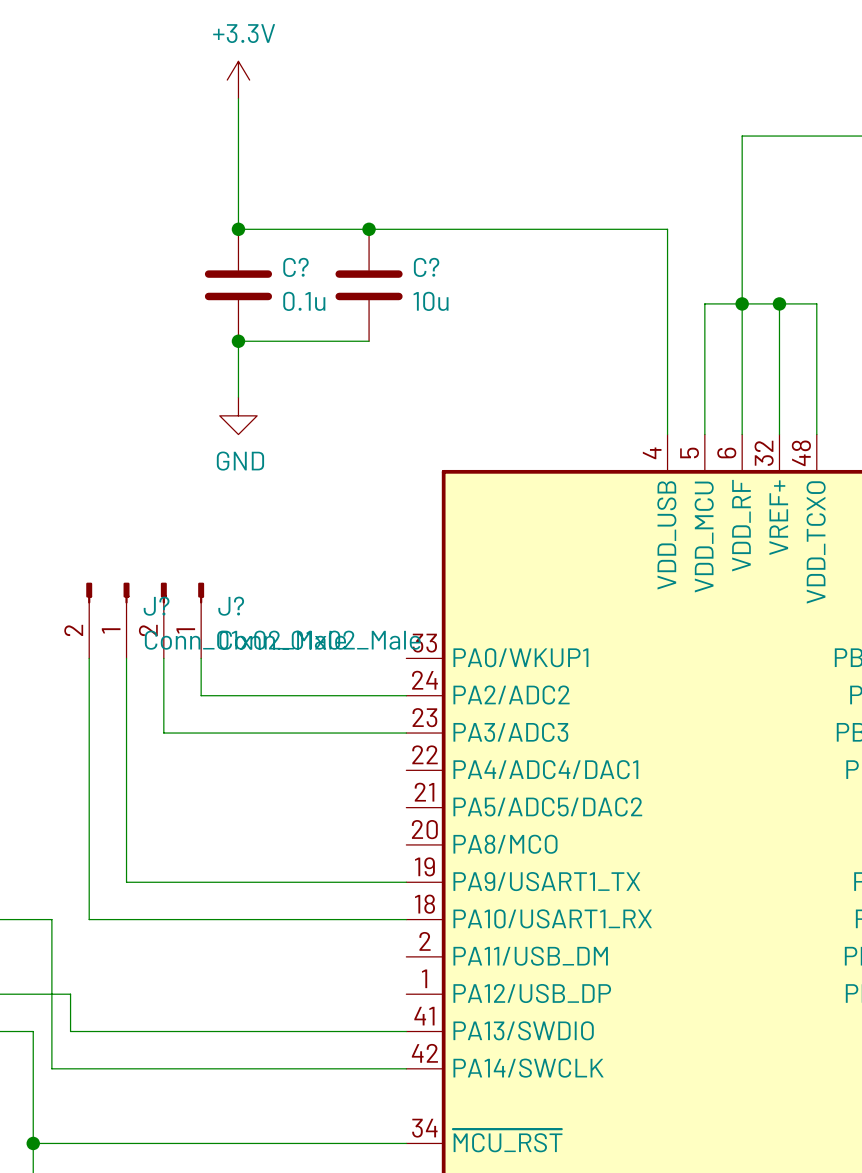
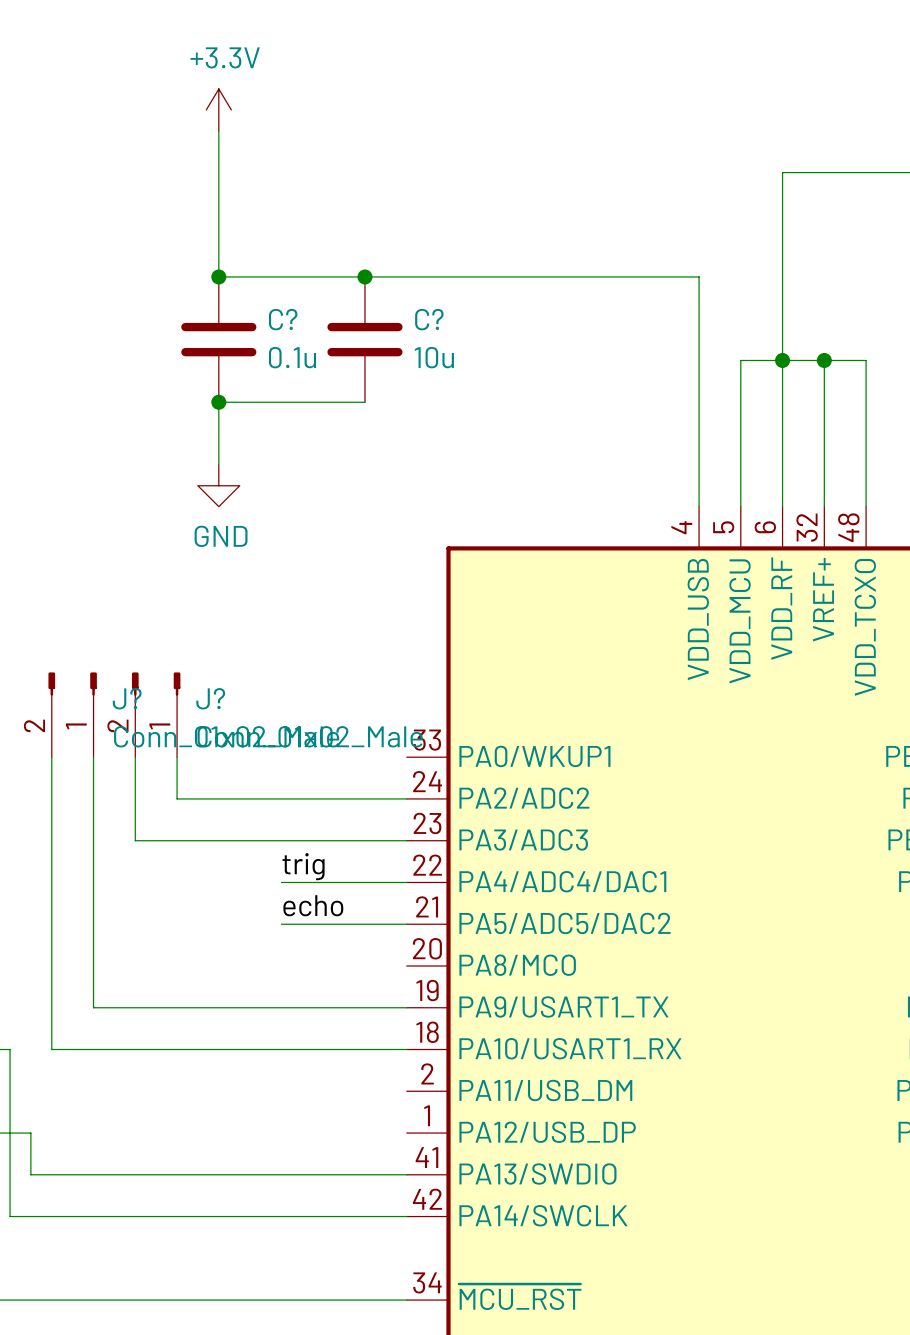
label: none -> trig (303, 866)
wire: none -> (281, 882) (406, 882)
label: none -> echo (313, 905)
wire: none -> (281, 924) (406, 924)

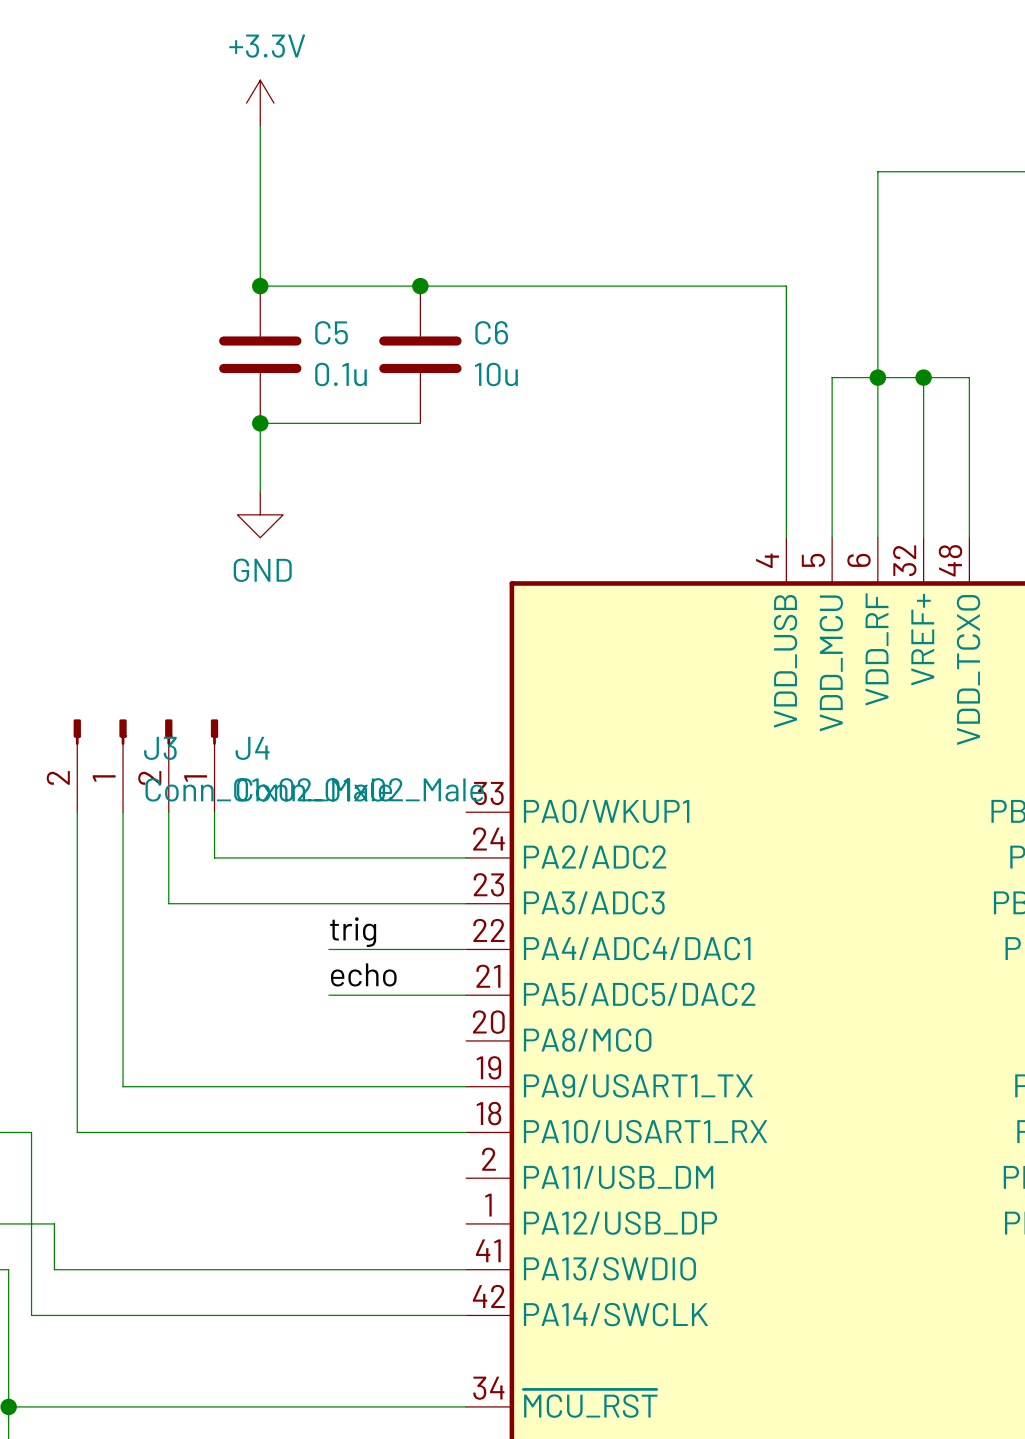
C? name: C? (283, 319) -> C5 (331, 332)
C? name: C? (429, 319) -> C6 (491, 332)
J? name: J? (127, 698) -> J3 (160, 748)
J? name: J? (210, 698) -> J4 (252, 748)

